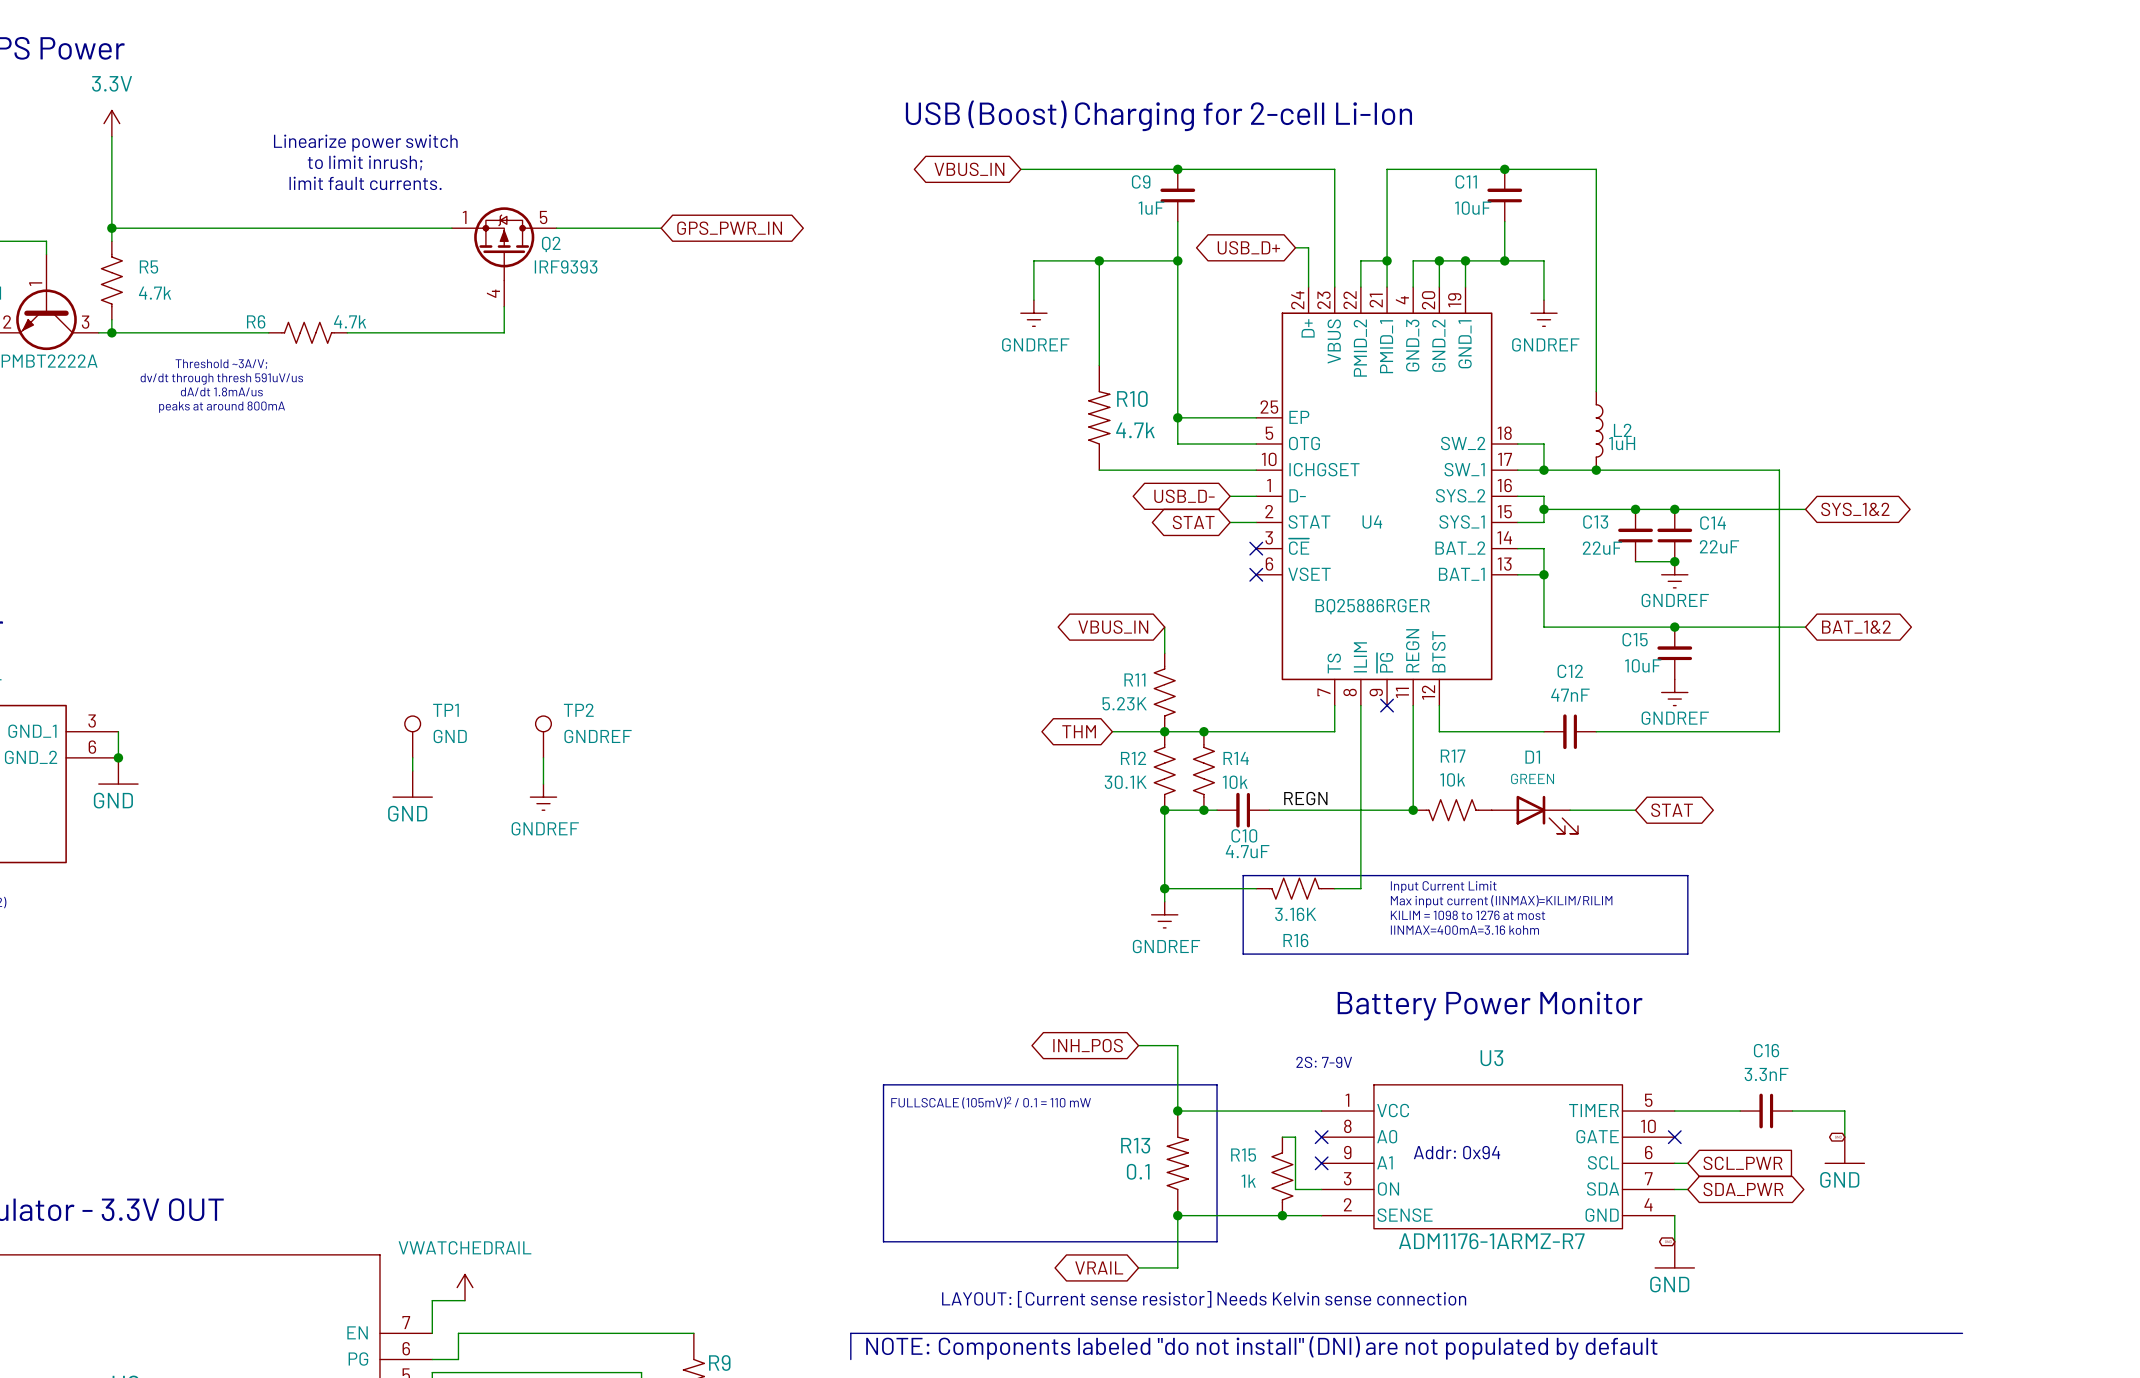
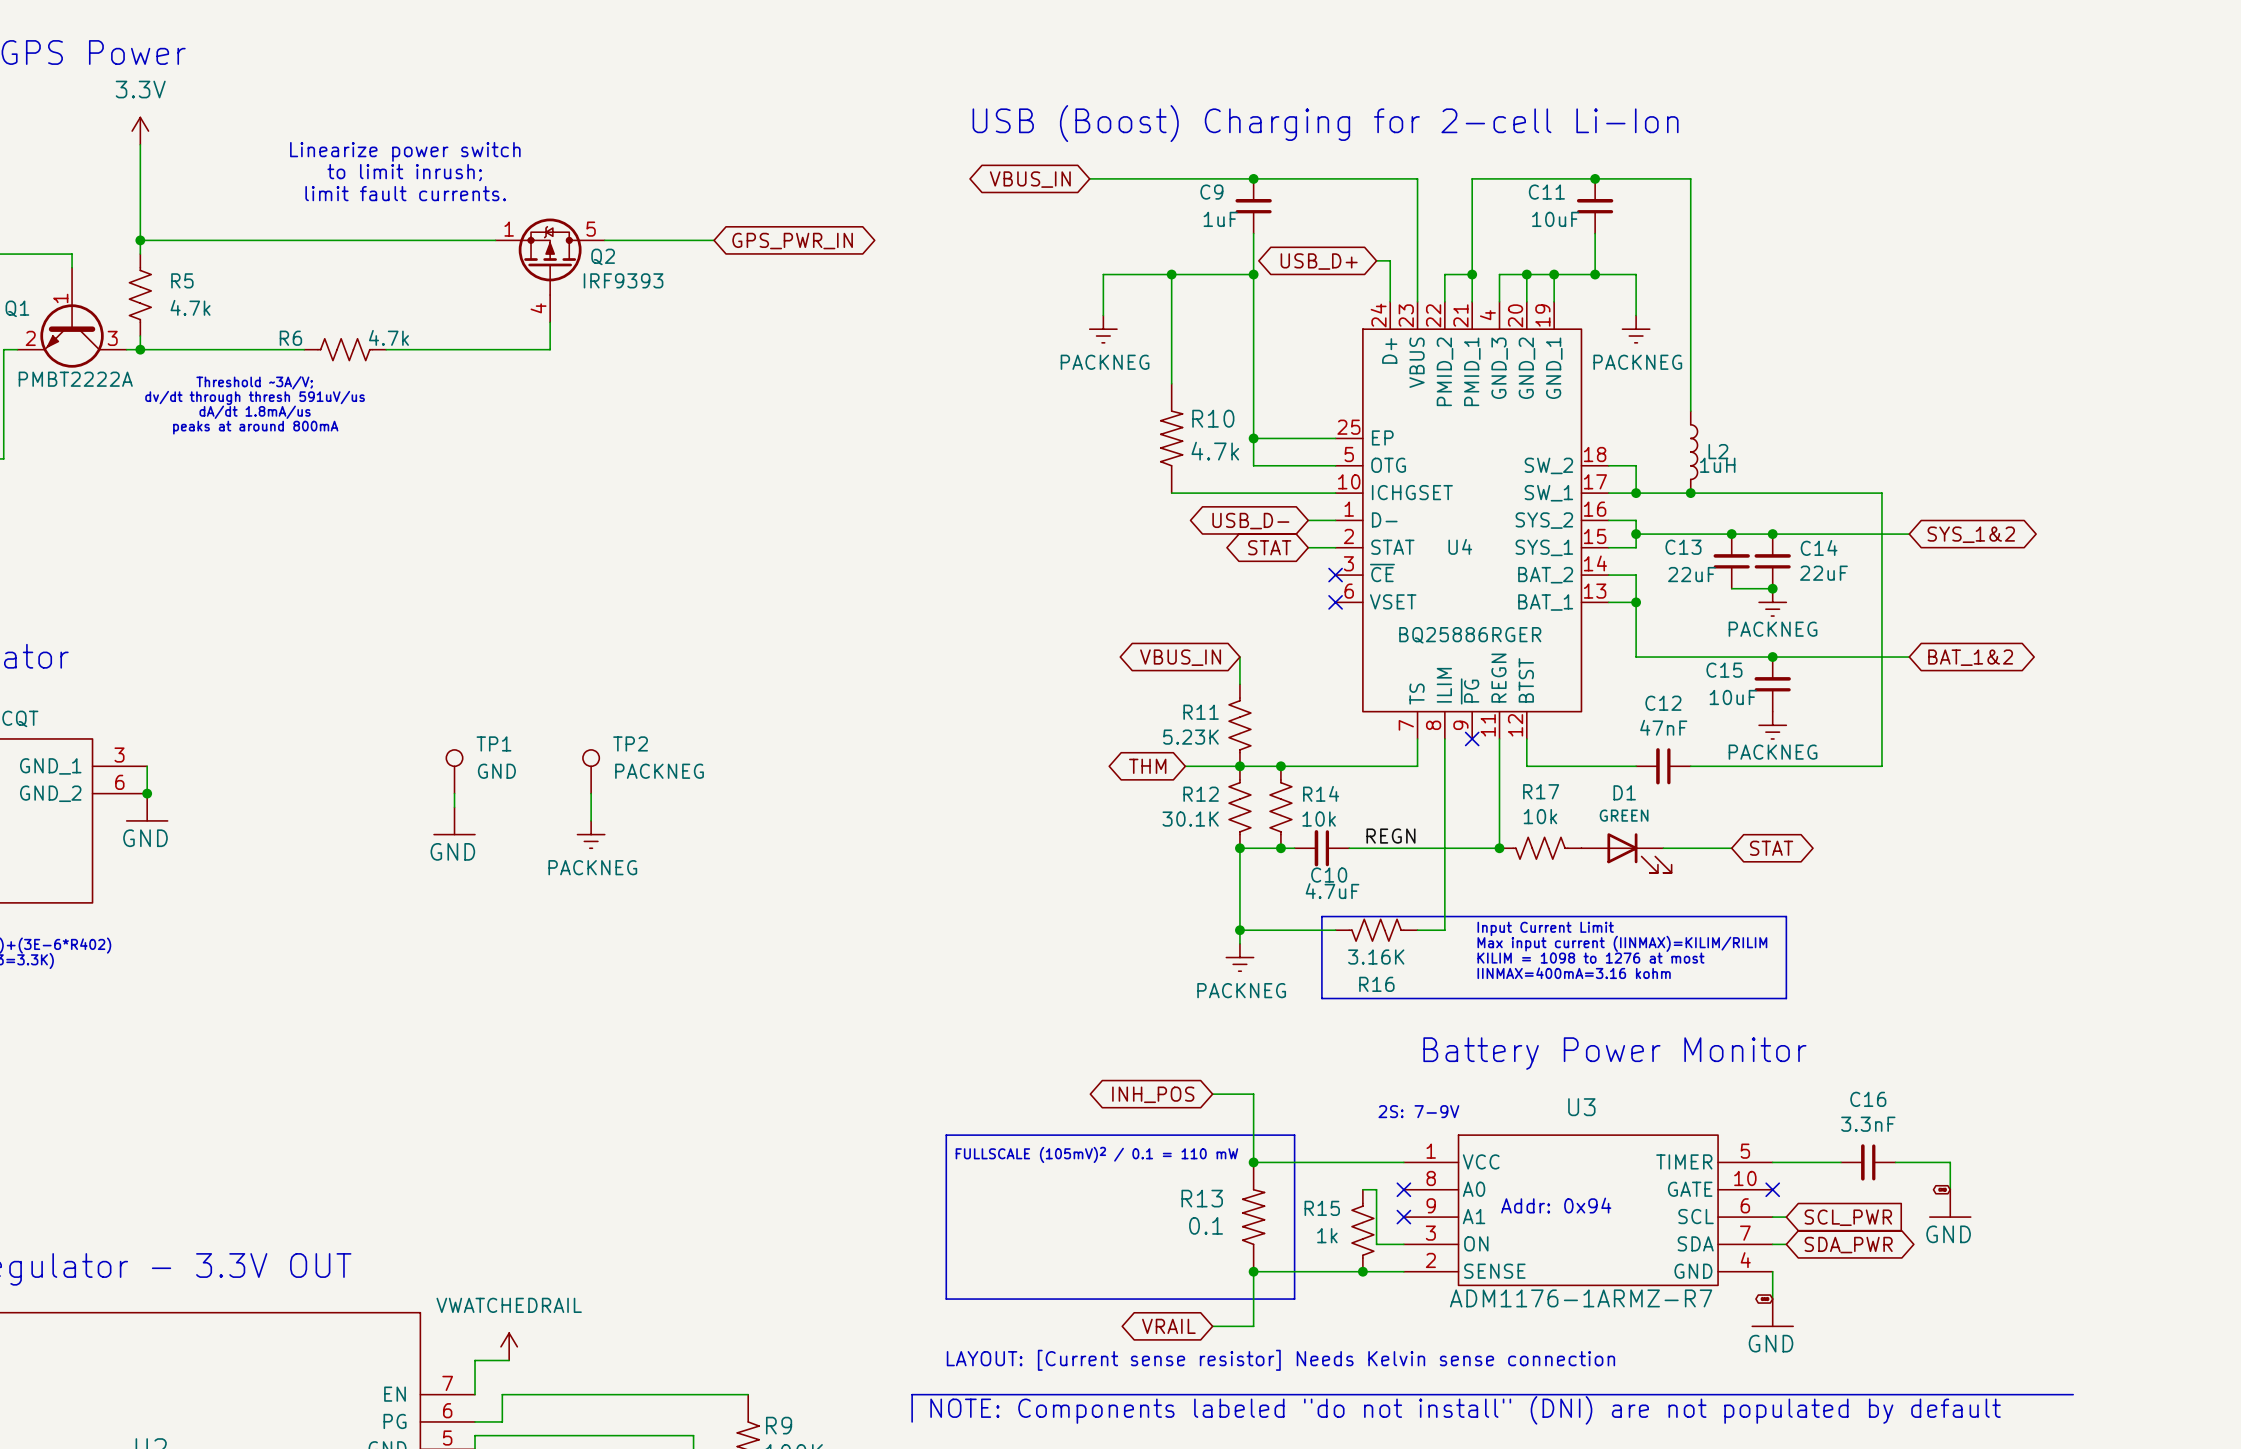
power symbol: GNDREF (1033, 313) -> PACKNEG (1103, 329)
power symbol: GNDREF (1543, 313) -> PACKNEG (1636, 329)
power symbol: GNDREF (1674, 574) -> PACKNEG (1772, 602)
power symbol: GNDREF (1674, 692) -> PACKNEG (1772, 725)
TP2 value: GNDREF (598, 736) -> PACKNEG (659, 771)
power symbol: GNDREF (543, 797) -> PACKNEG (591, 834)
power symbol: GNDREF (1164, 914) -> PACKNEG (1239, 957)

